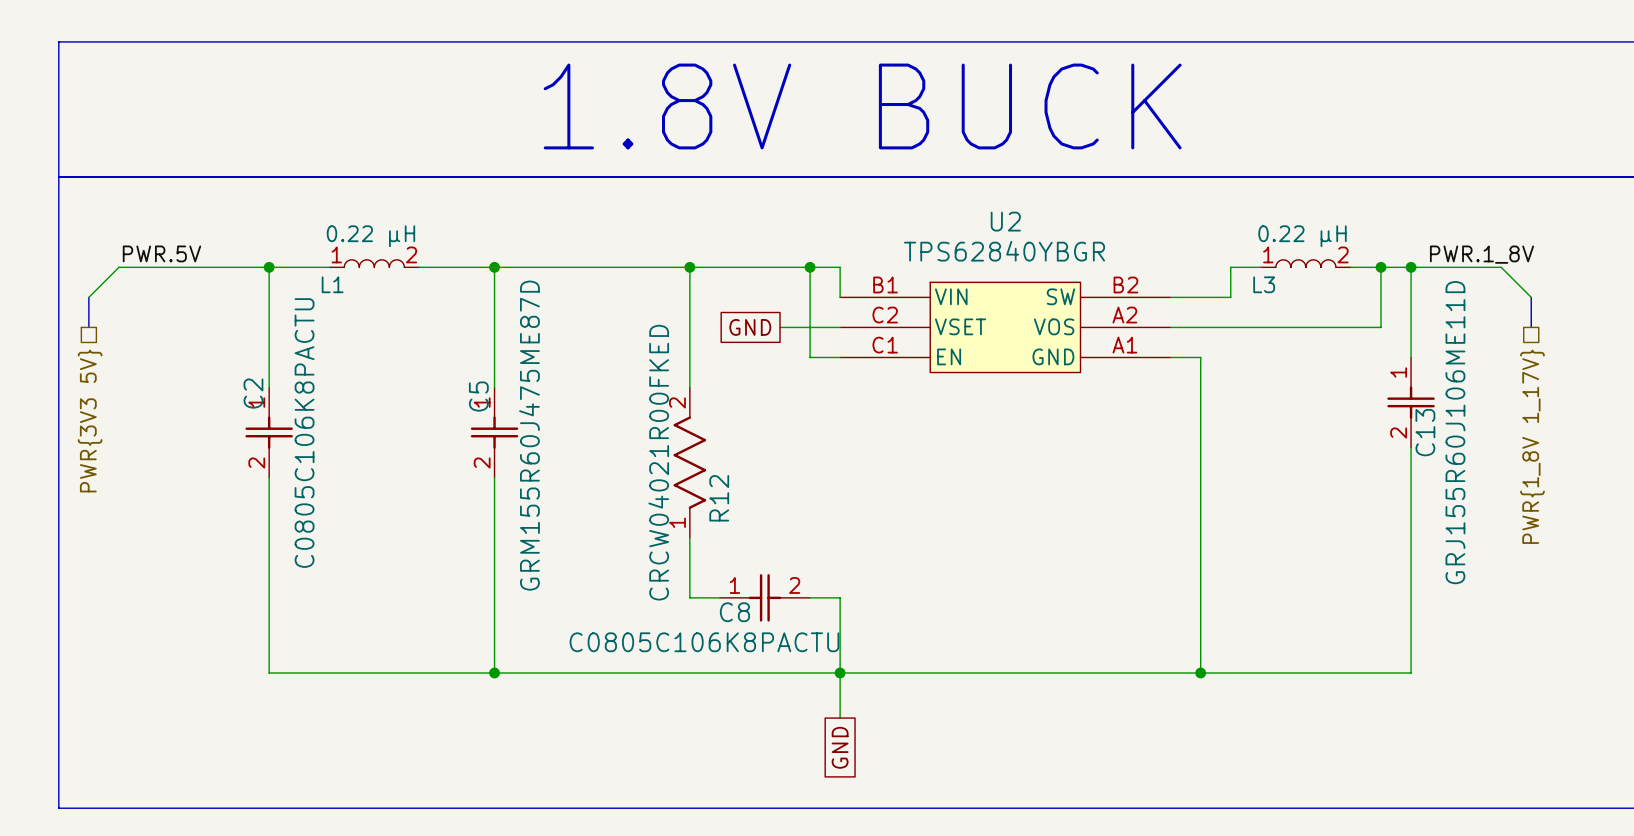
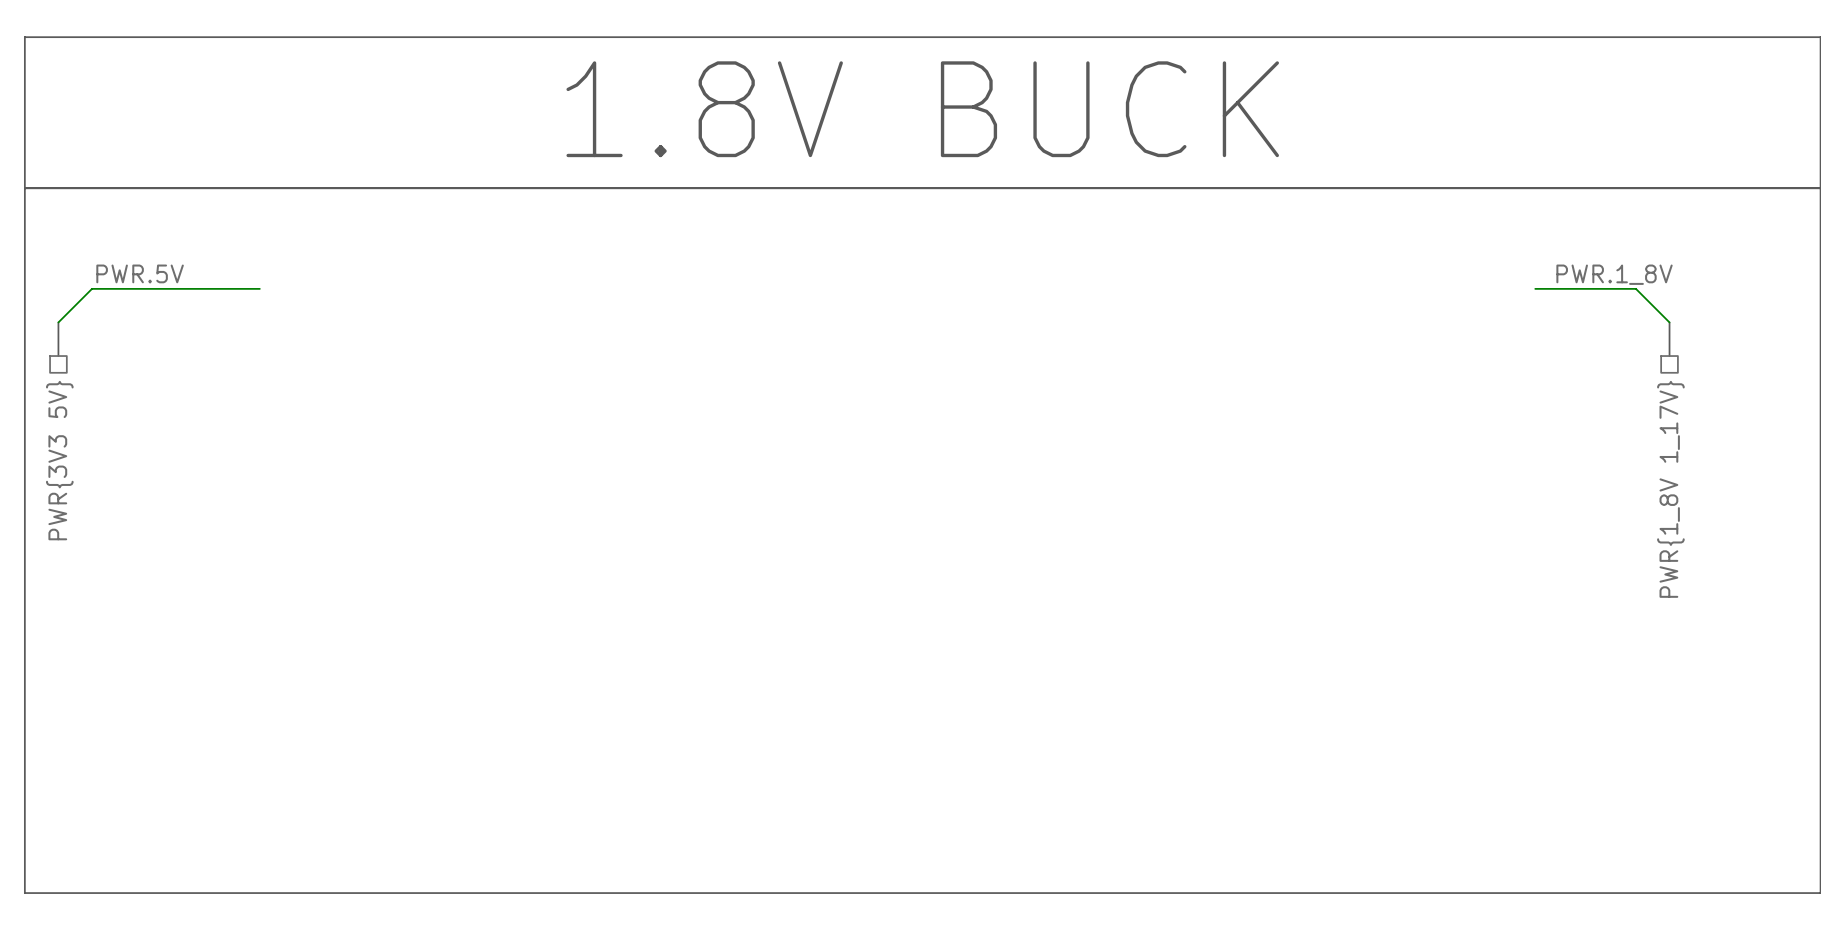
L1: (374, 263) -> none
L3: (1305, 263) -> none
junction: (269, 267) -> none
wire: (329, 267) (269, 267) (269, 387) -> none
wire: (419, 267) (840, 267) (840, 297) -> none
wire: (494, 267) (494, 387) -> none
junction: (494, 267) -> none
wire: (689, 267) (689, 387) -> none
junction: (689, 267) -> none
wire: (810, 267) (810, 357) (840, 357) -> none
junction: (810, 267) -> none
wire: (1260, 267) (1230, 267) (1230, 297) (1170, 297) -> none
wire: (1350, 267) (1411, 267) (1411, 357) -> none
wire: (1380, 267) (1380, 327) (1170, 327) -> none
junction: (1380, 267) -> none
junction: (1411, 267) -> none
global label: GND (750, 327) -> none
wire: (780, 327) (840, 327) -> none
U2: TPS62840YBGR (1005, 327) -> none
wire: (1170, 357) (1200, 357) (1200, 673) -> none
C13: GRJ155R60J106ME11D (1411, 402) -> none
C2: C0805C106K8PACTU (269, 432) -> none
C5: GRM155R60J475ME87D (494, 432) -> none
wire: (1411, 447) (1411, 673) (269, 673) (269, 477) -> none
R12: CRCW04021R00FKED (689, 462) -> none
wire: (494, 477) (494, 673) -> none
wire: (689, 537) (689, 597) (719, 597) -> none
C8: C0805C106K8PACTU (764, 597) -> none
wire: (810, 597) (840, 597) (840, 718) -> none
junction: (494, 673) -> none
junction: (840, 673) -> none
junction: (1200, 673) -> none
global label: GND (840, 747) -> none

